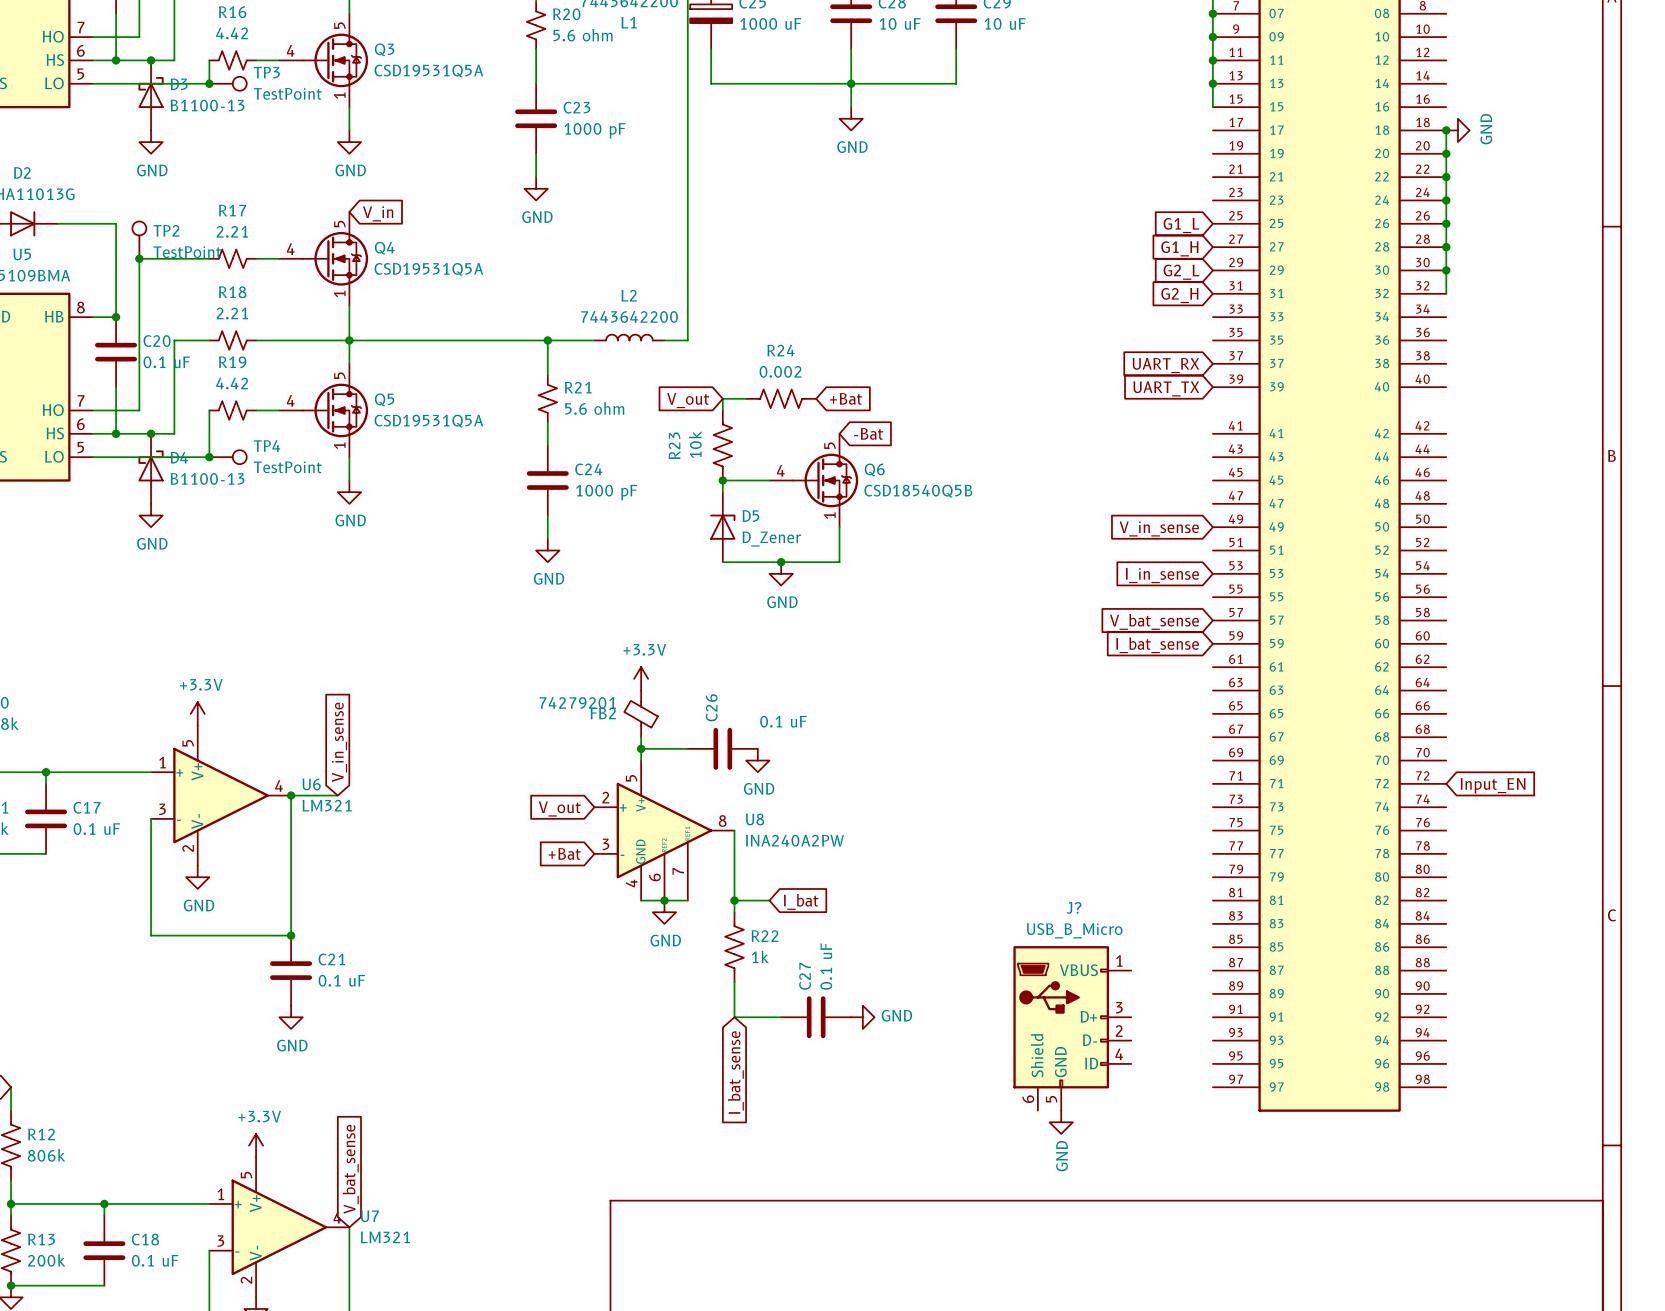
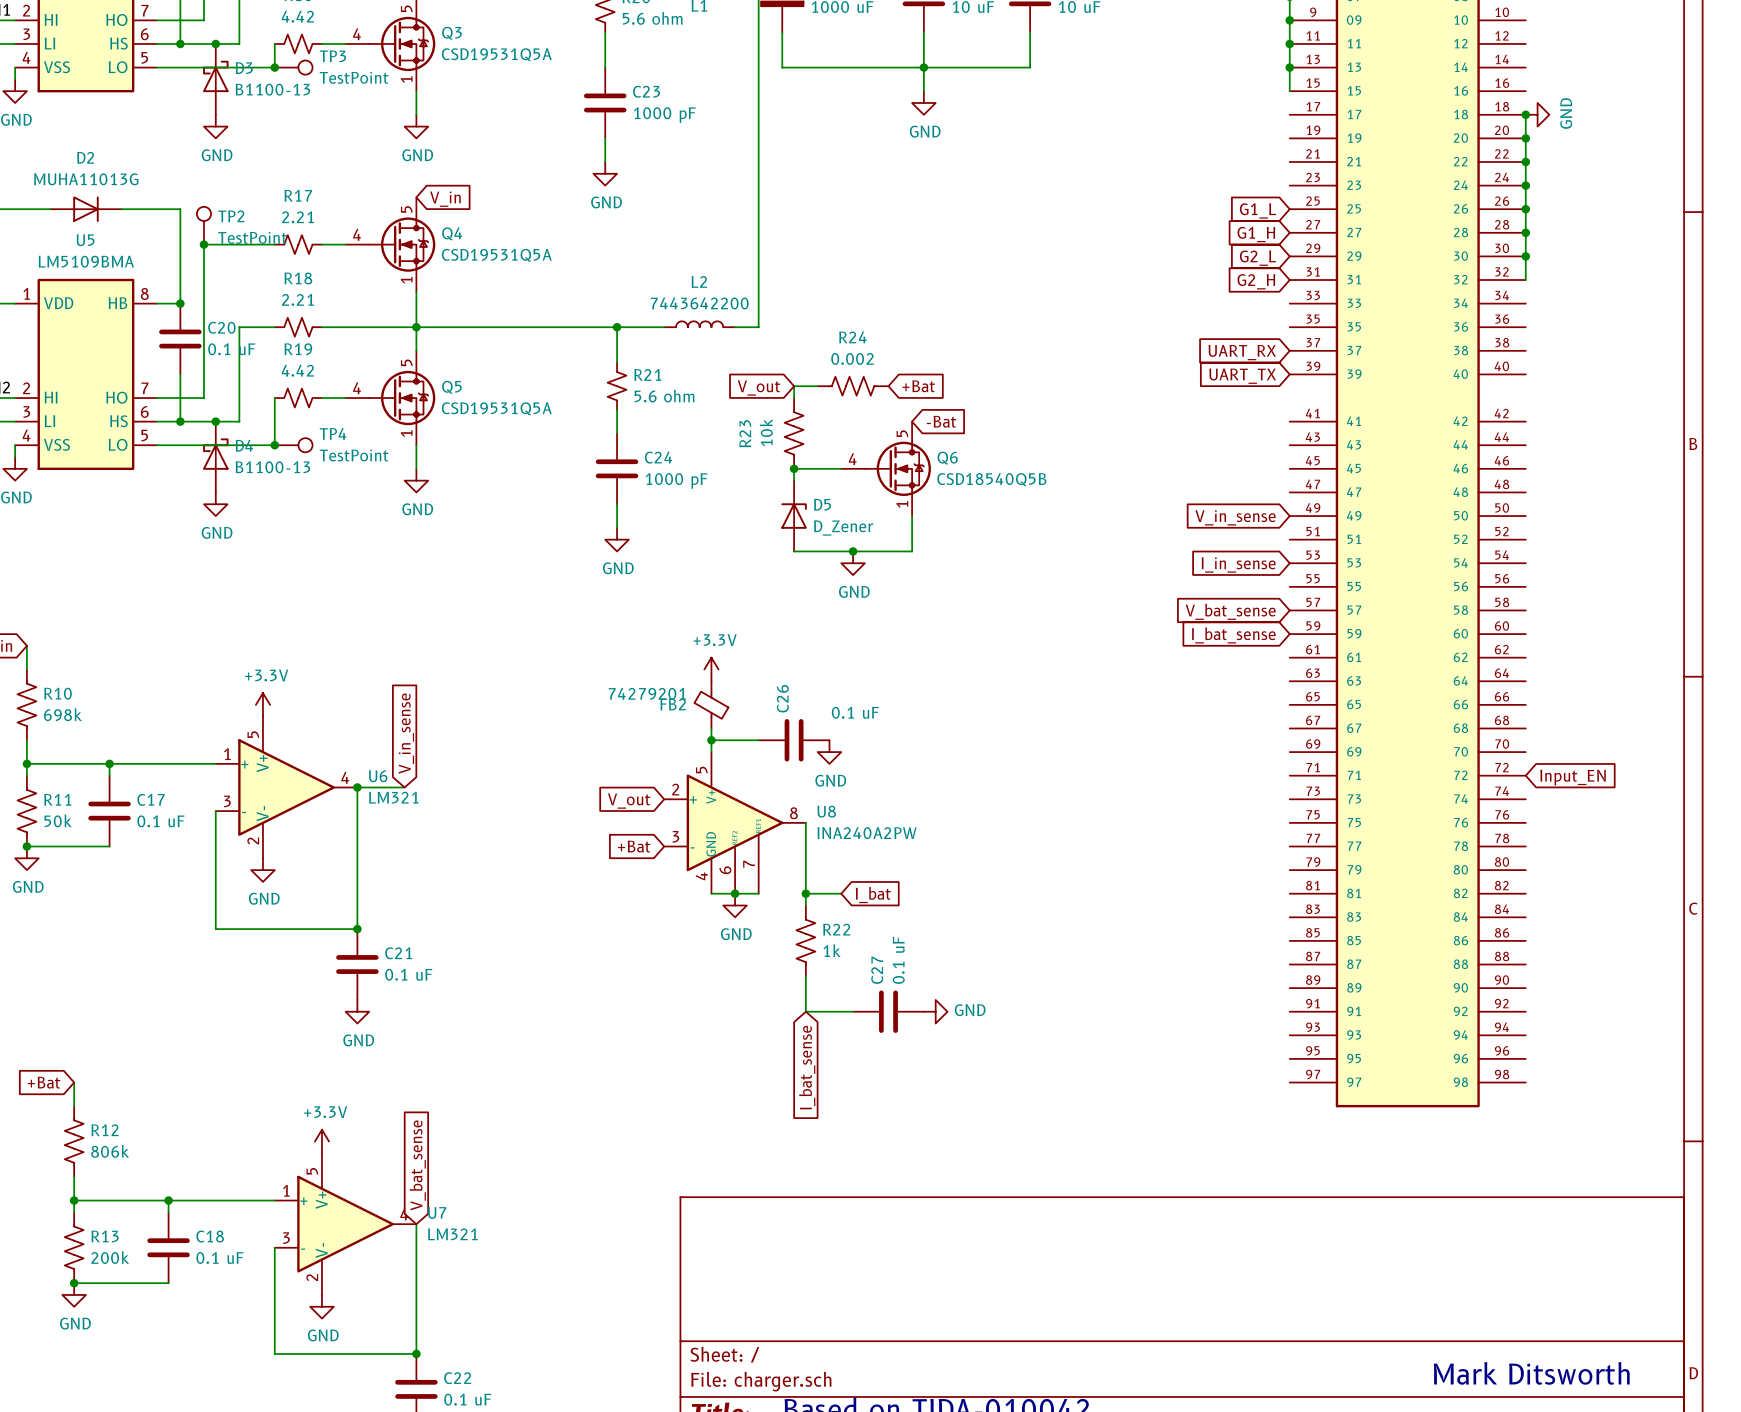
J?: USB_B_Micro (1072, 1028) -> none
power symbol: GND (1061, 1122) -> none

